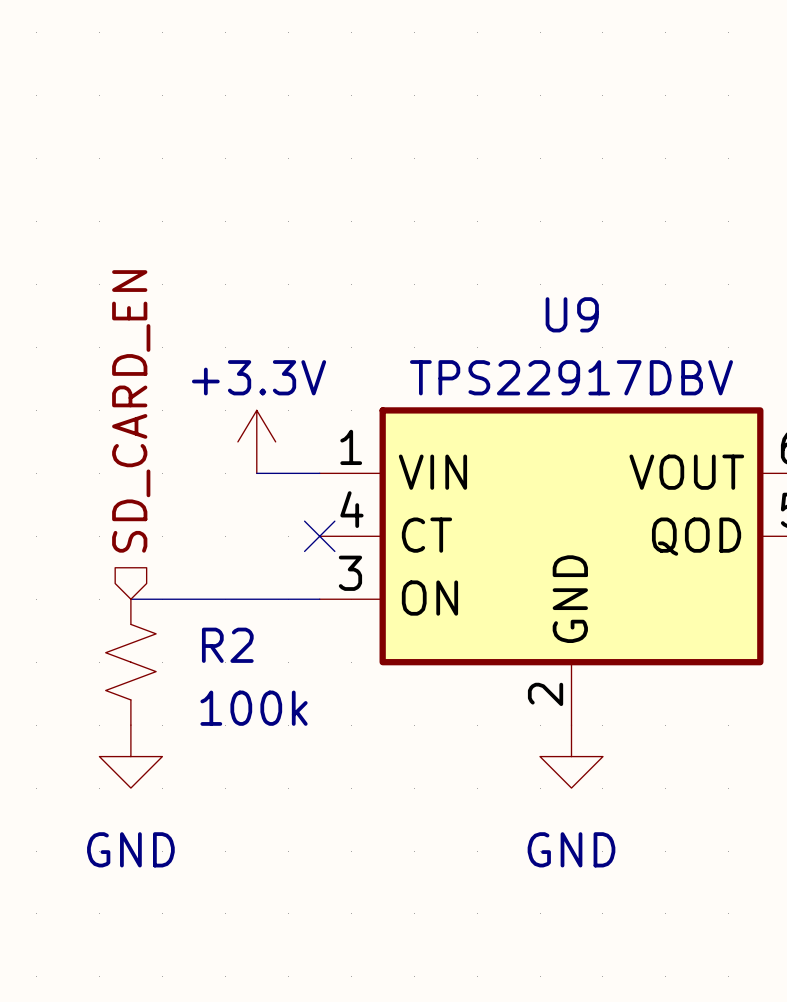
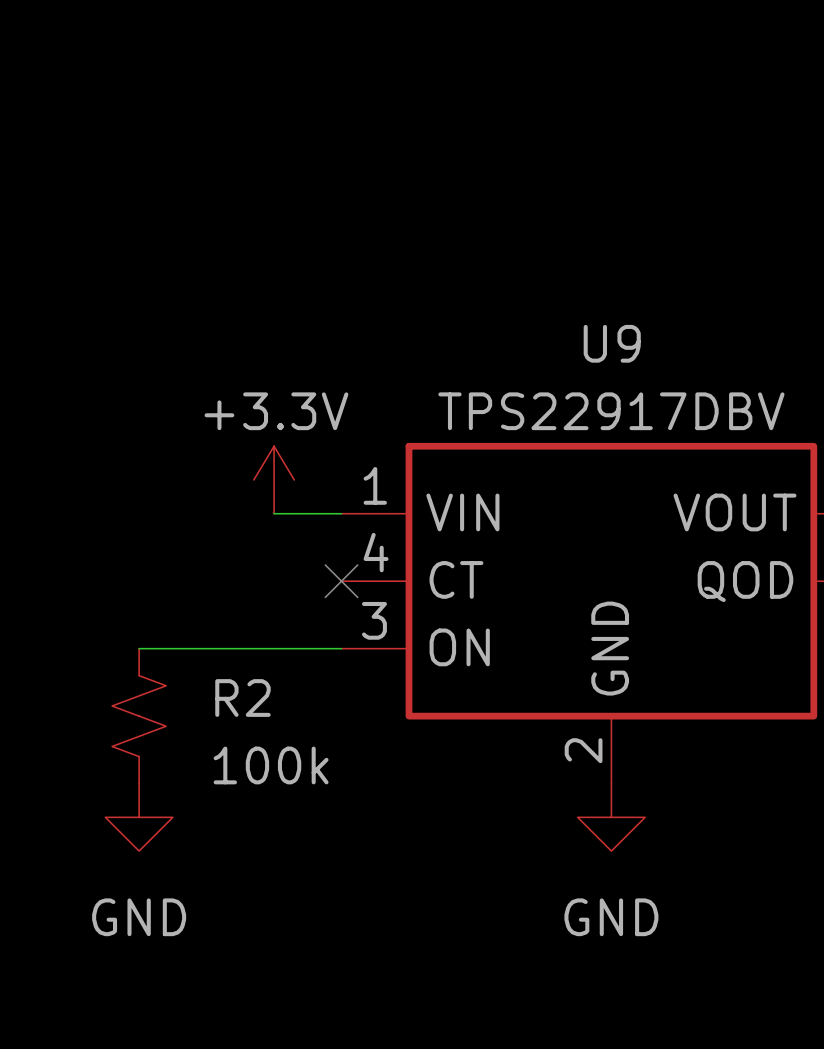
hierarchical label: SD_CARD_EN (131, 411) -> none

